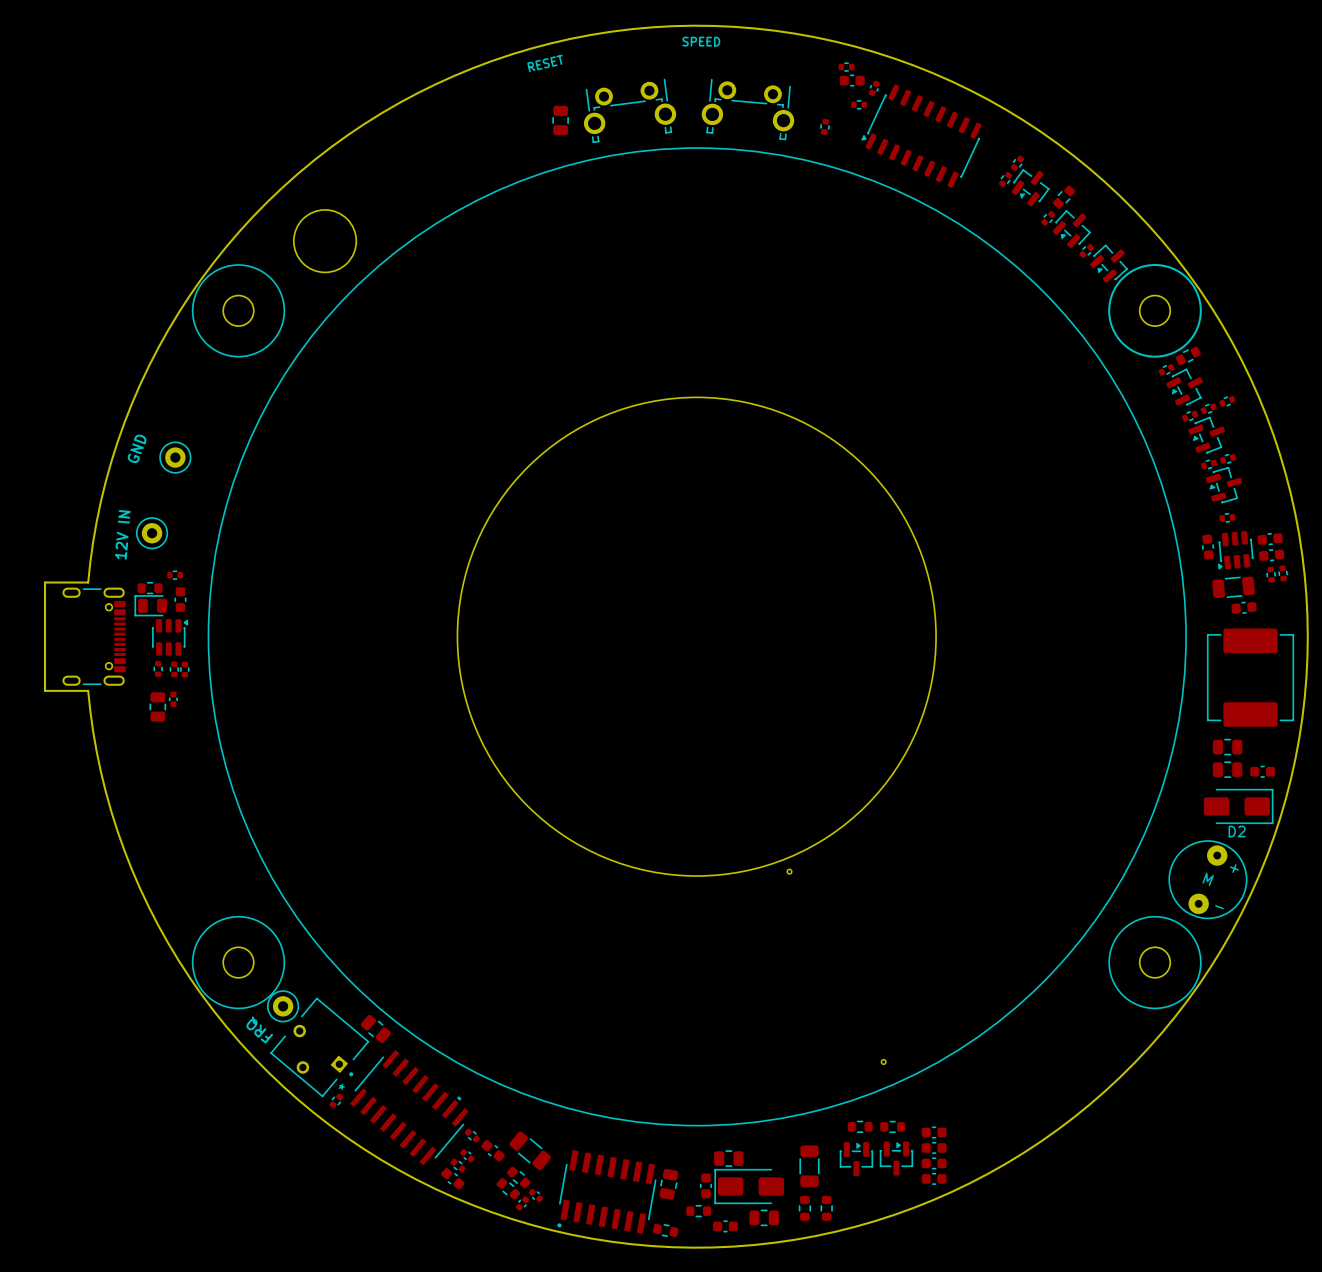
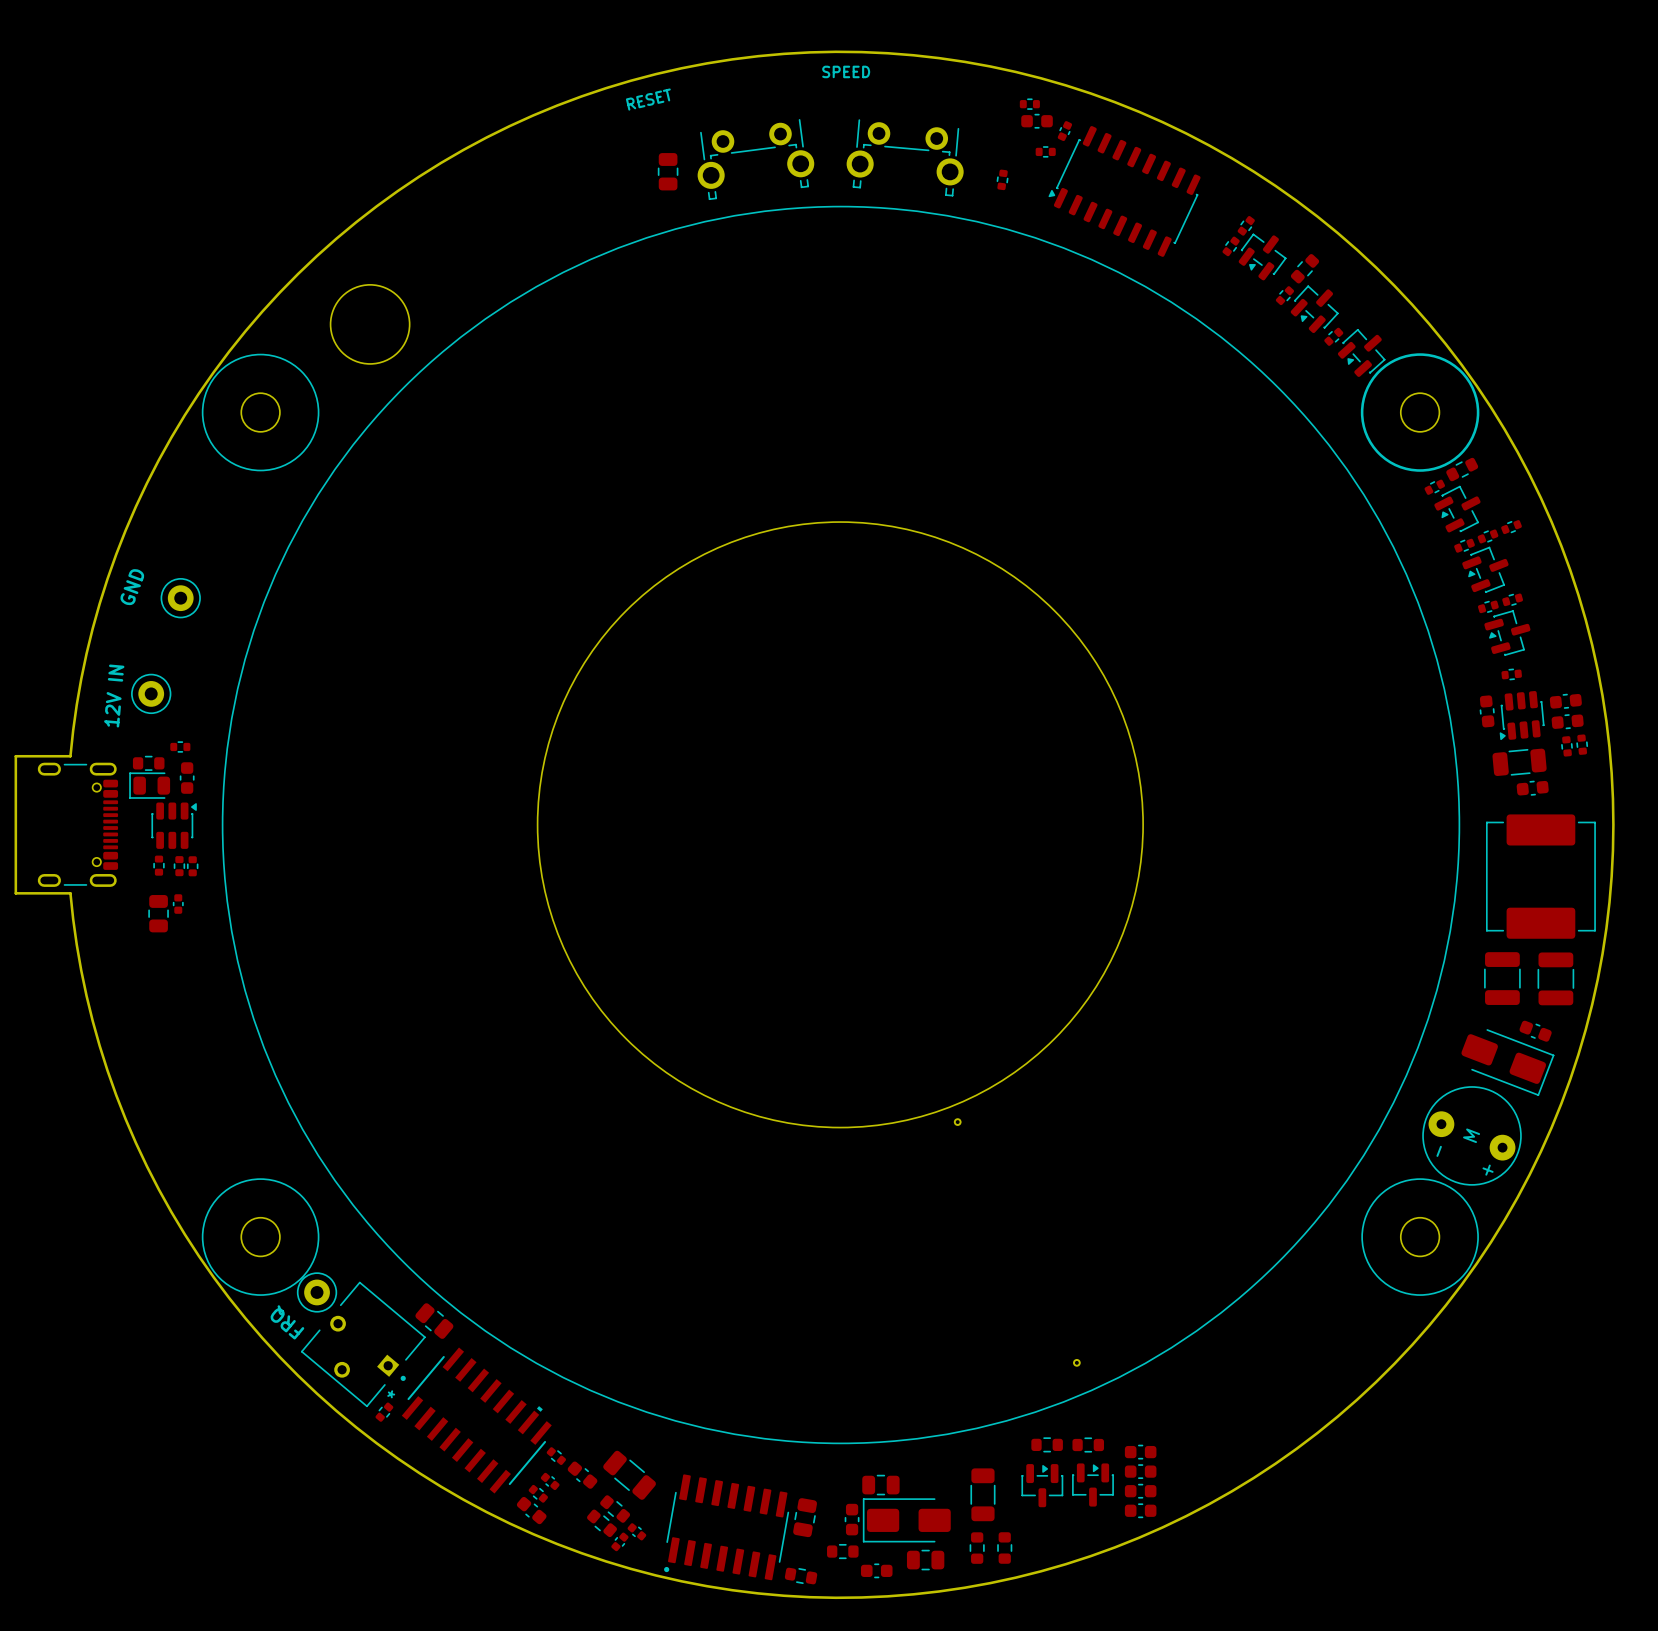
part: (1227, 747) -> none
part: none -> (1502, 978)
part: none -> (1555, 978)
part: (1227, 769) -> none
part: (1262, 771) -> none
part: none -> (1535, 1031)
D2: (1238, 806) -> none
part: none -> (1507, 1062)
part rotation: 0° (1207, 879) -> 90° clockwise (1472, 1135)

